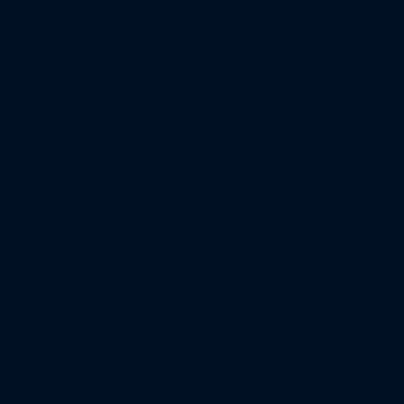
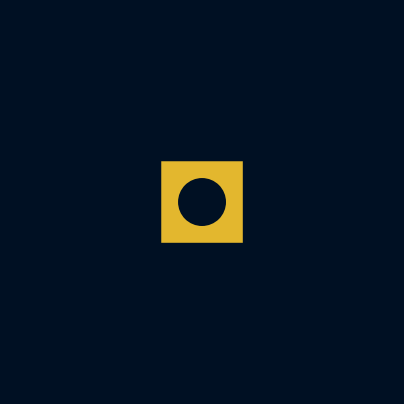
part: none -> (202, 202)

